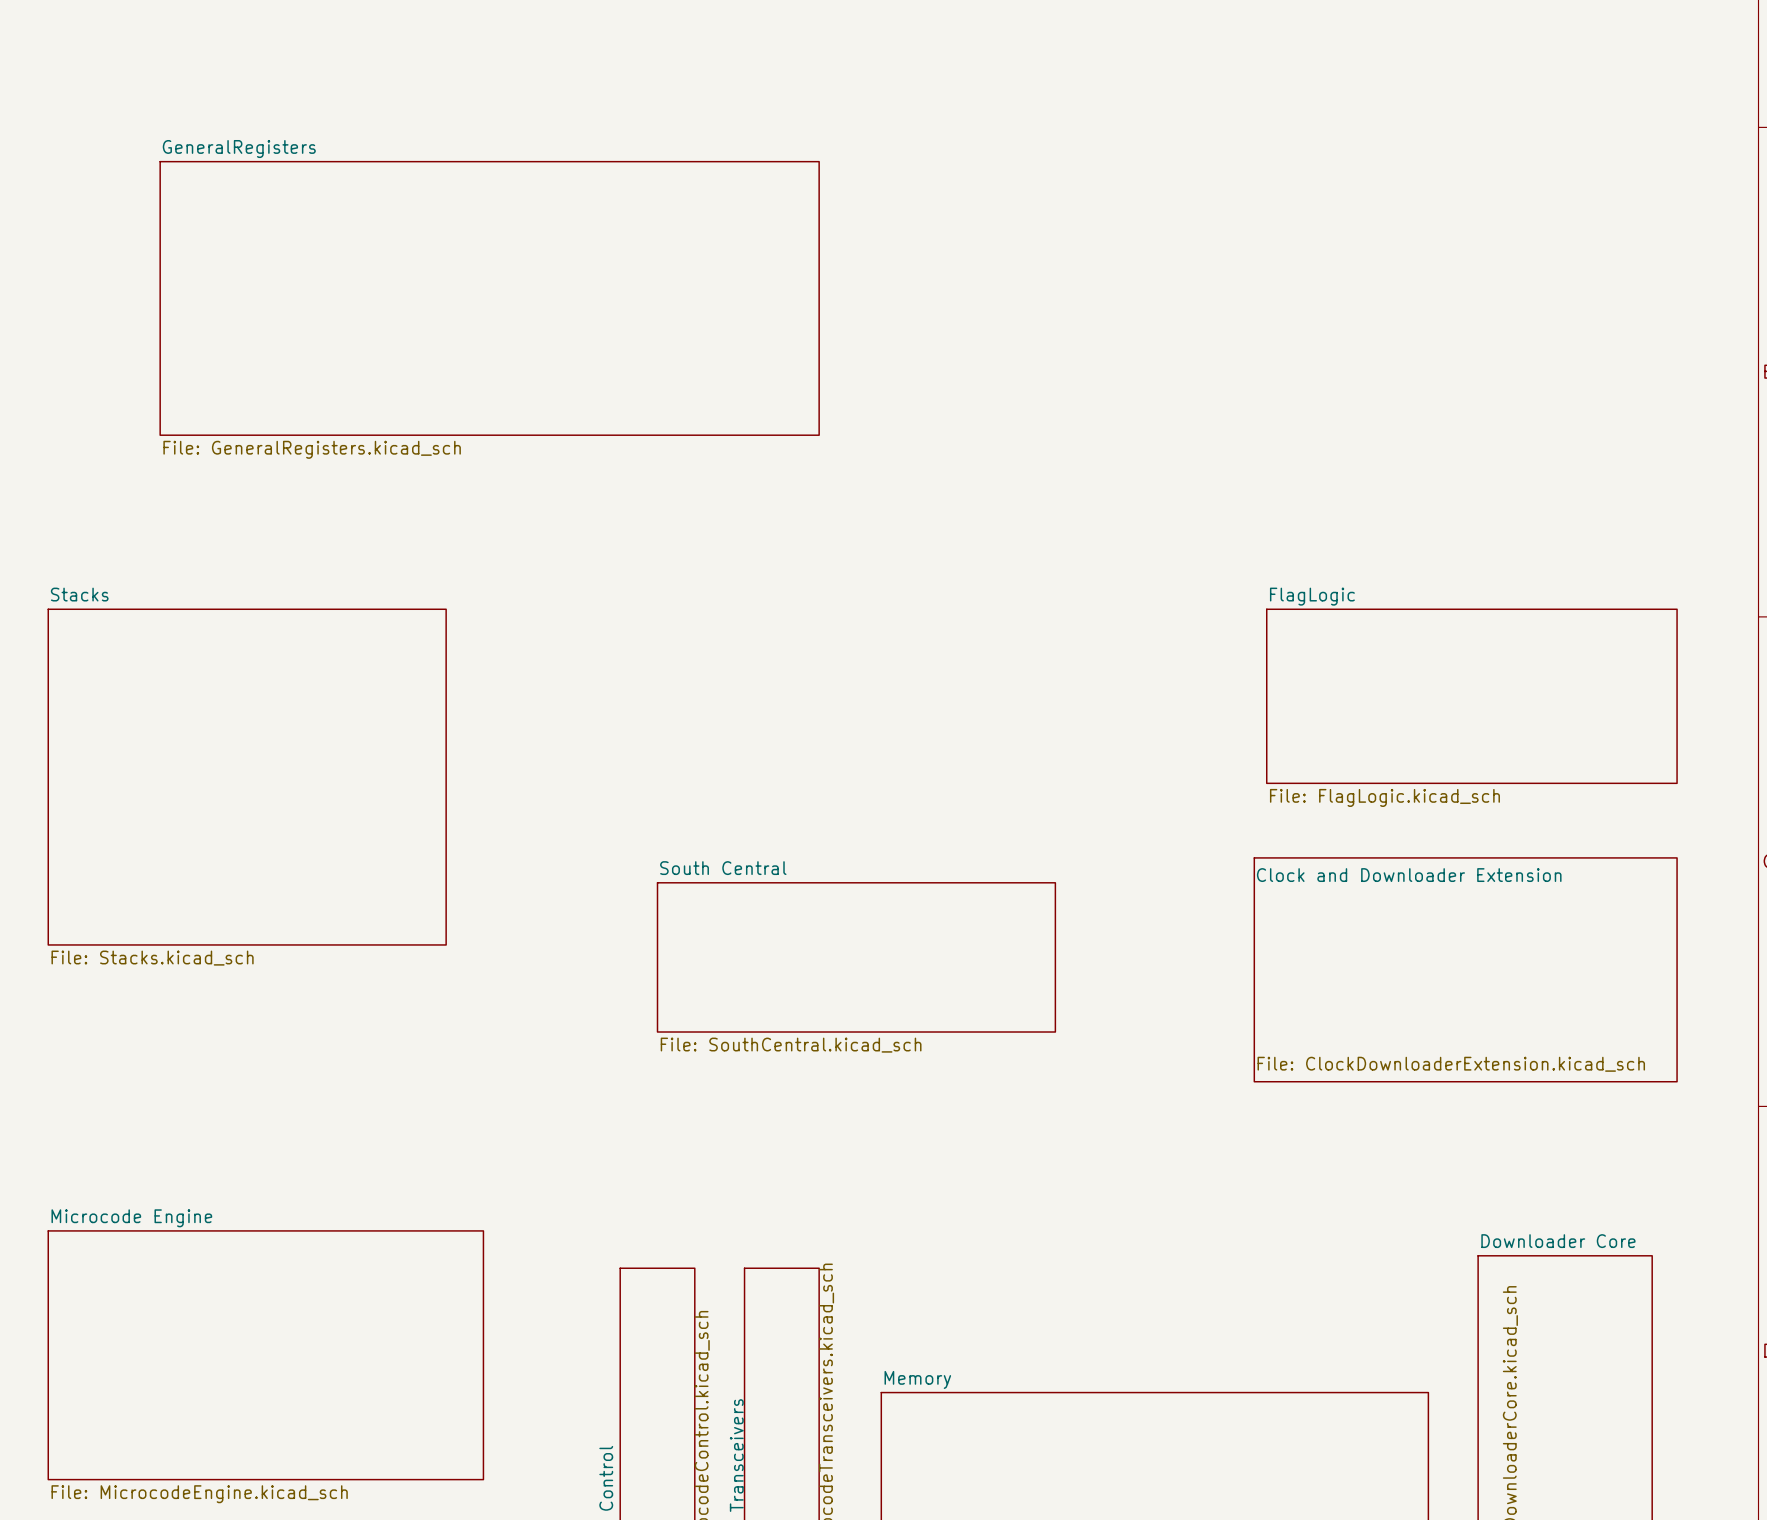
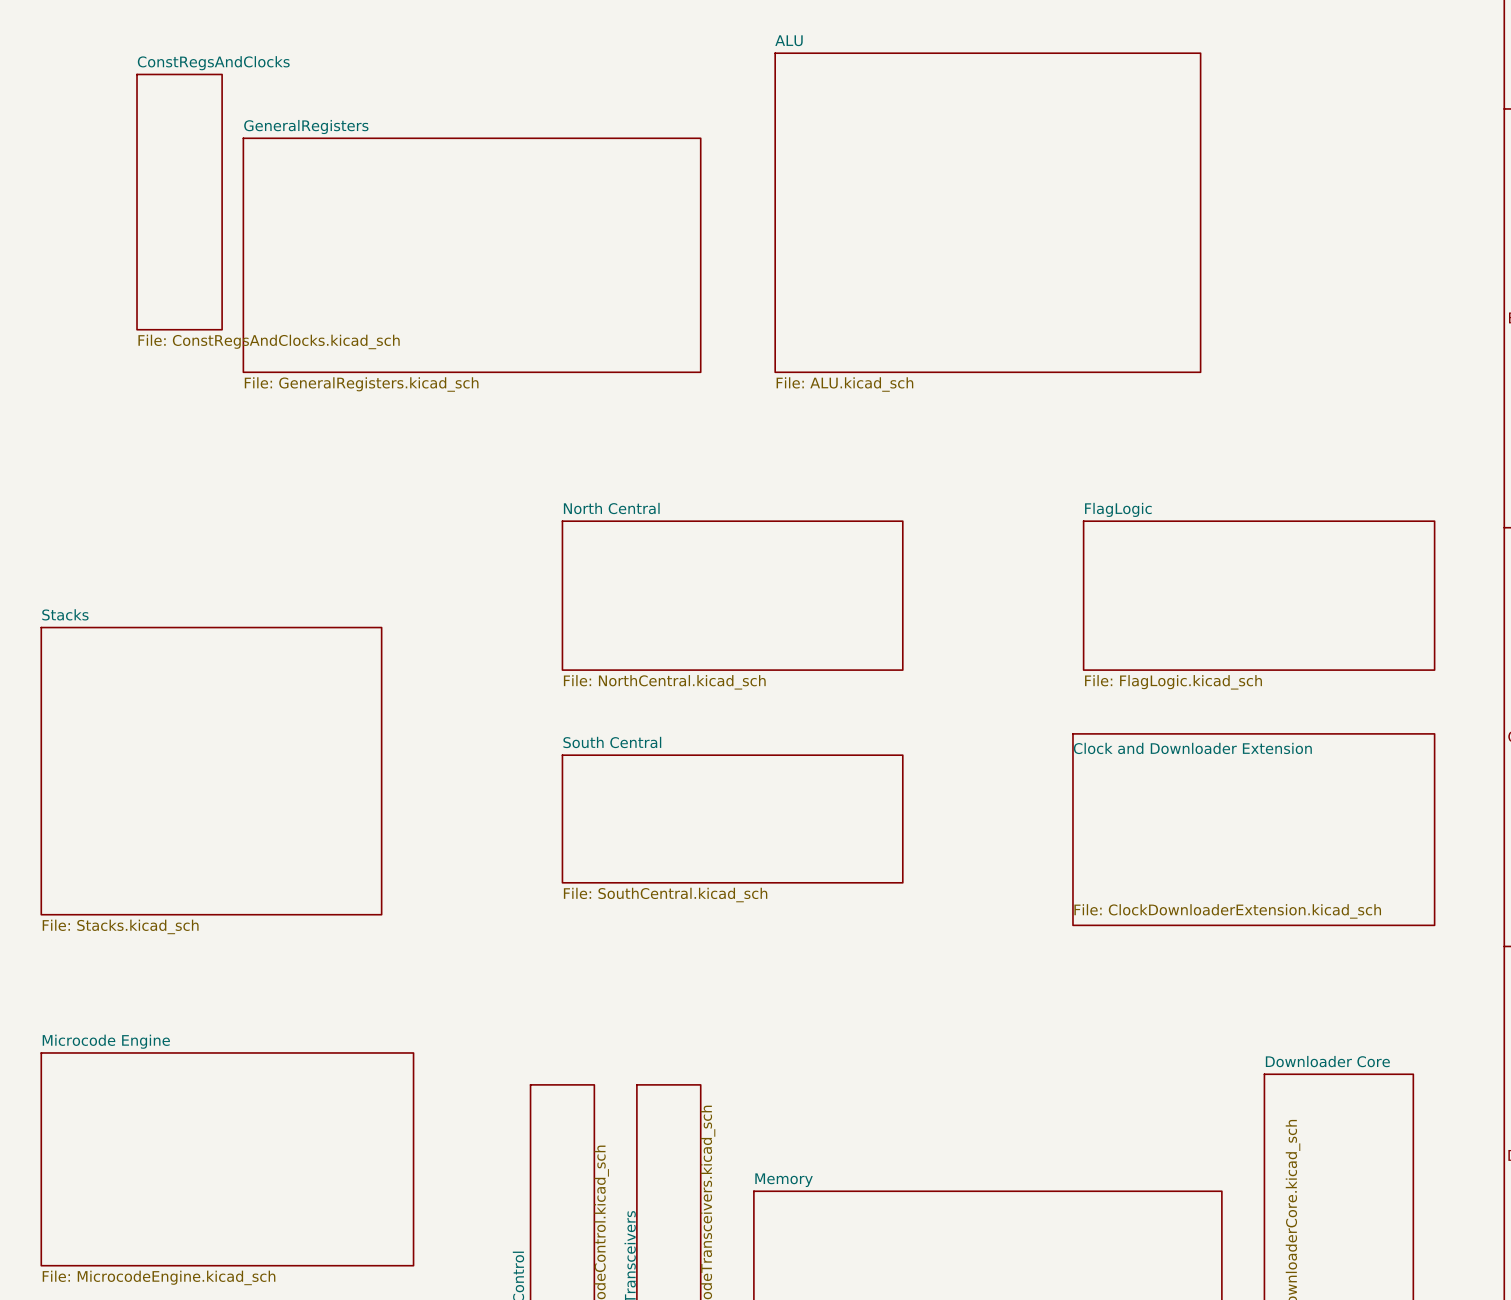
sheet ConstRegsAndClocks: none -> File: ConstRegsAndClocks.kicad_sch (179, 202)
sheet ALU: none -> File: ALU.kicad_sch (987, 212)
sheet GeneralRegisters: File: GeneralRegisters.kicad_sch (489, 298) -> none
sheet GeneralRegisters: none -> File: GeneralRegisters.kicad_sch (472, 255)
sheet North Central: none -> File: NorthCentral.kicad_sch (732, 595)
sheet Stacks position: (247, 777) -> (211, 771)

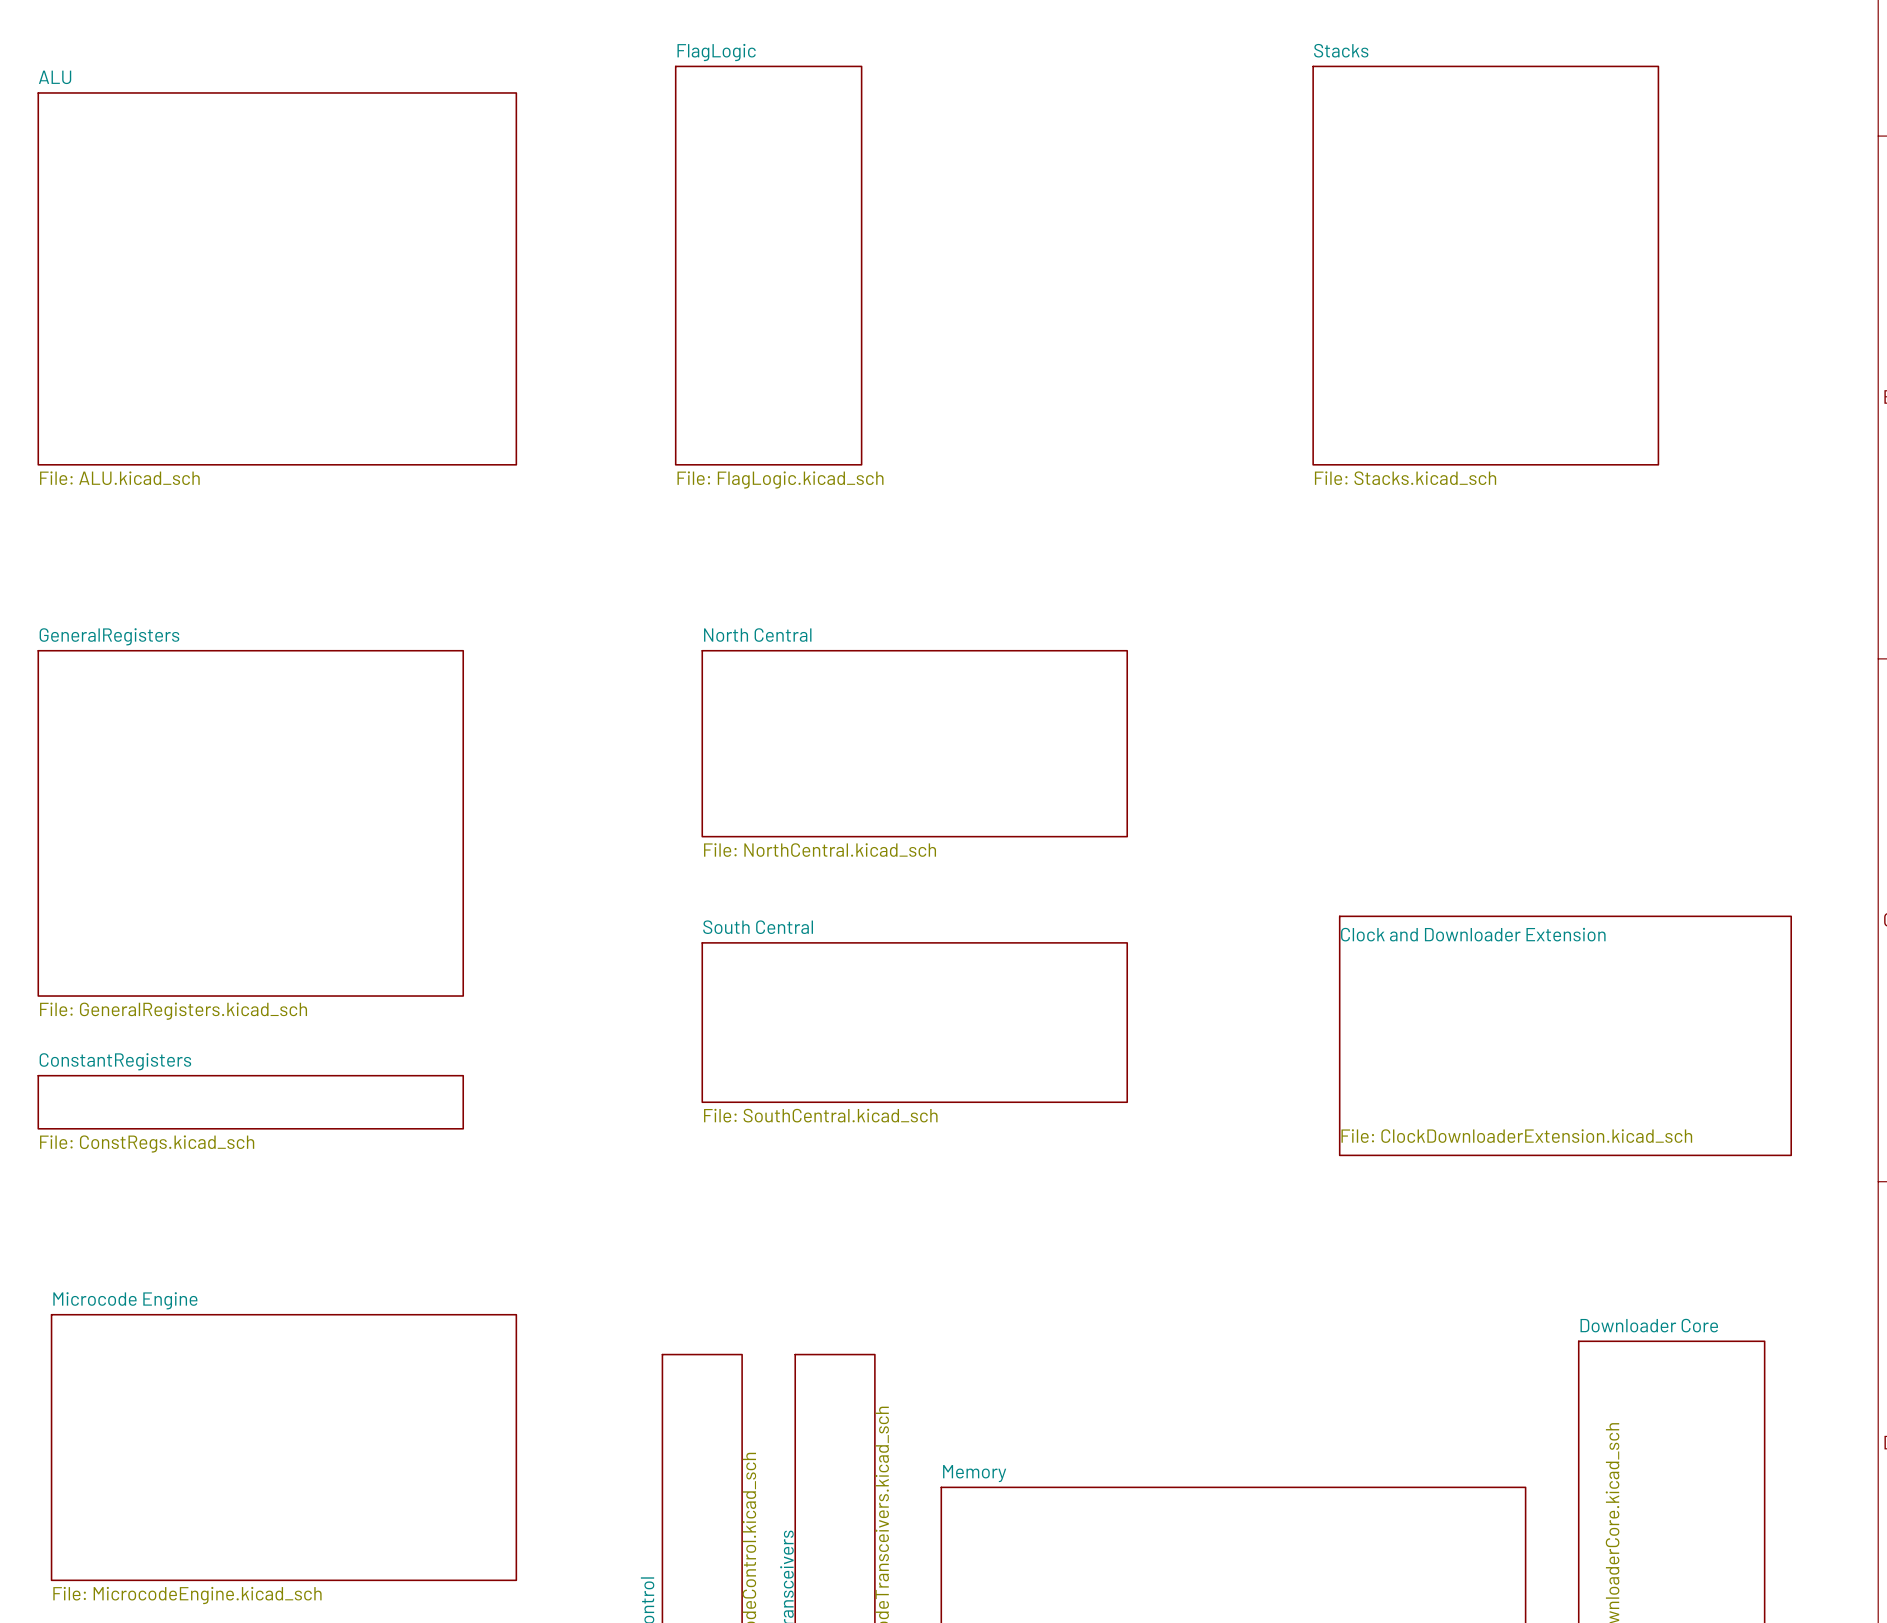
sheet ConstRegsAndClocks: File: ConstRegsAndClocks.kicad_sch (179, 202) -> none
sheet FlagLogic: none -> File: FlagLogic.kicad_sch (768, 265)
sheet ALU: File: ALU.kicad_sch (987, 212) -> none
sheet Stacks: none -> File: Stacks.kicad_sch (1485, 265)
sheet ALU: none -> File: ALU.kicad_sch (277, 278)
sheet GeneralRegisters: File: GeneralRegisters.kicad_sch (472, 255) -> none
sheet FlagLogic: File: FlagLogic.kicad_sch (1259, 595) -> none
sheet GeneralRegisters: none -> File: GeneralRegisters.kicad_sch (250, 823)
sheet Stacks: File: Stacks.kicad_sch (211, 771) -> none
sheet ConstantRegisters: none -> File: ConstRegs.kicad_sch (250, 1102)

